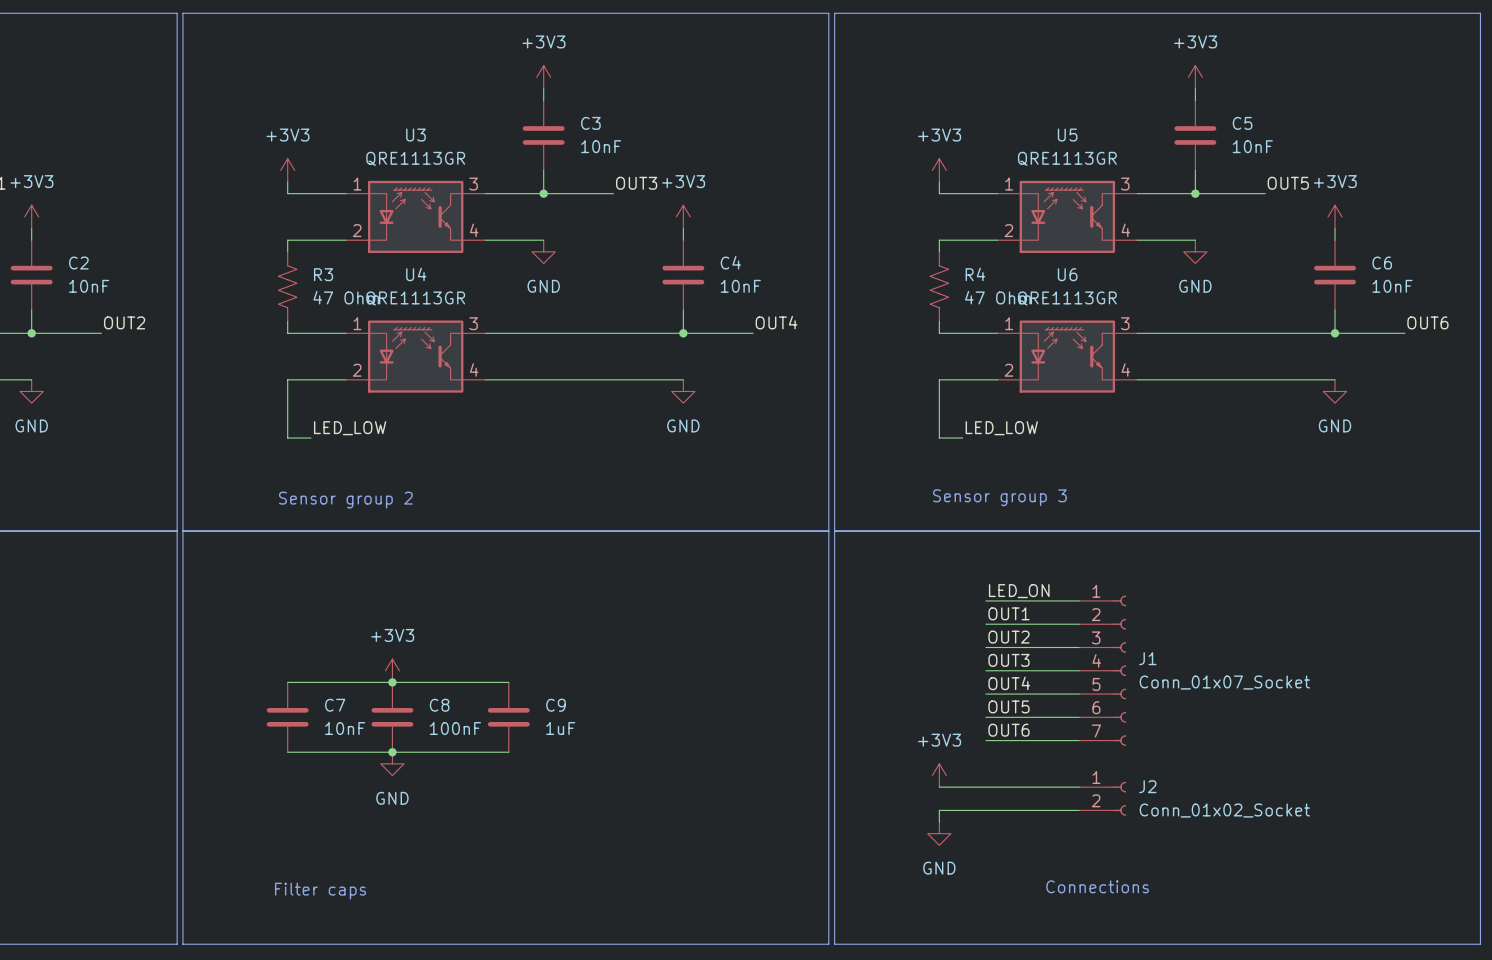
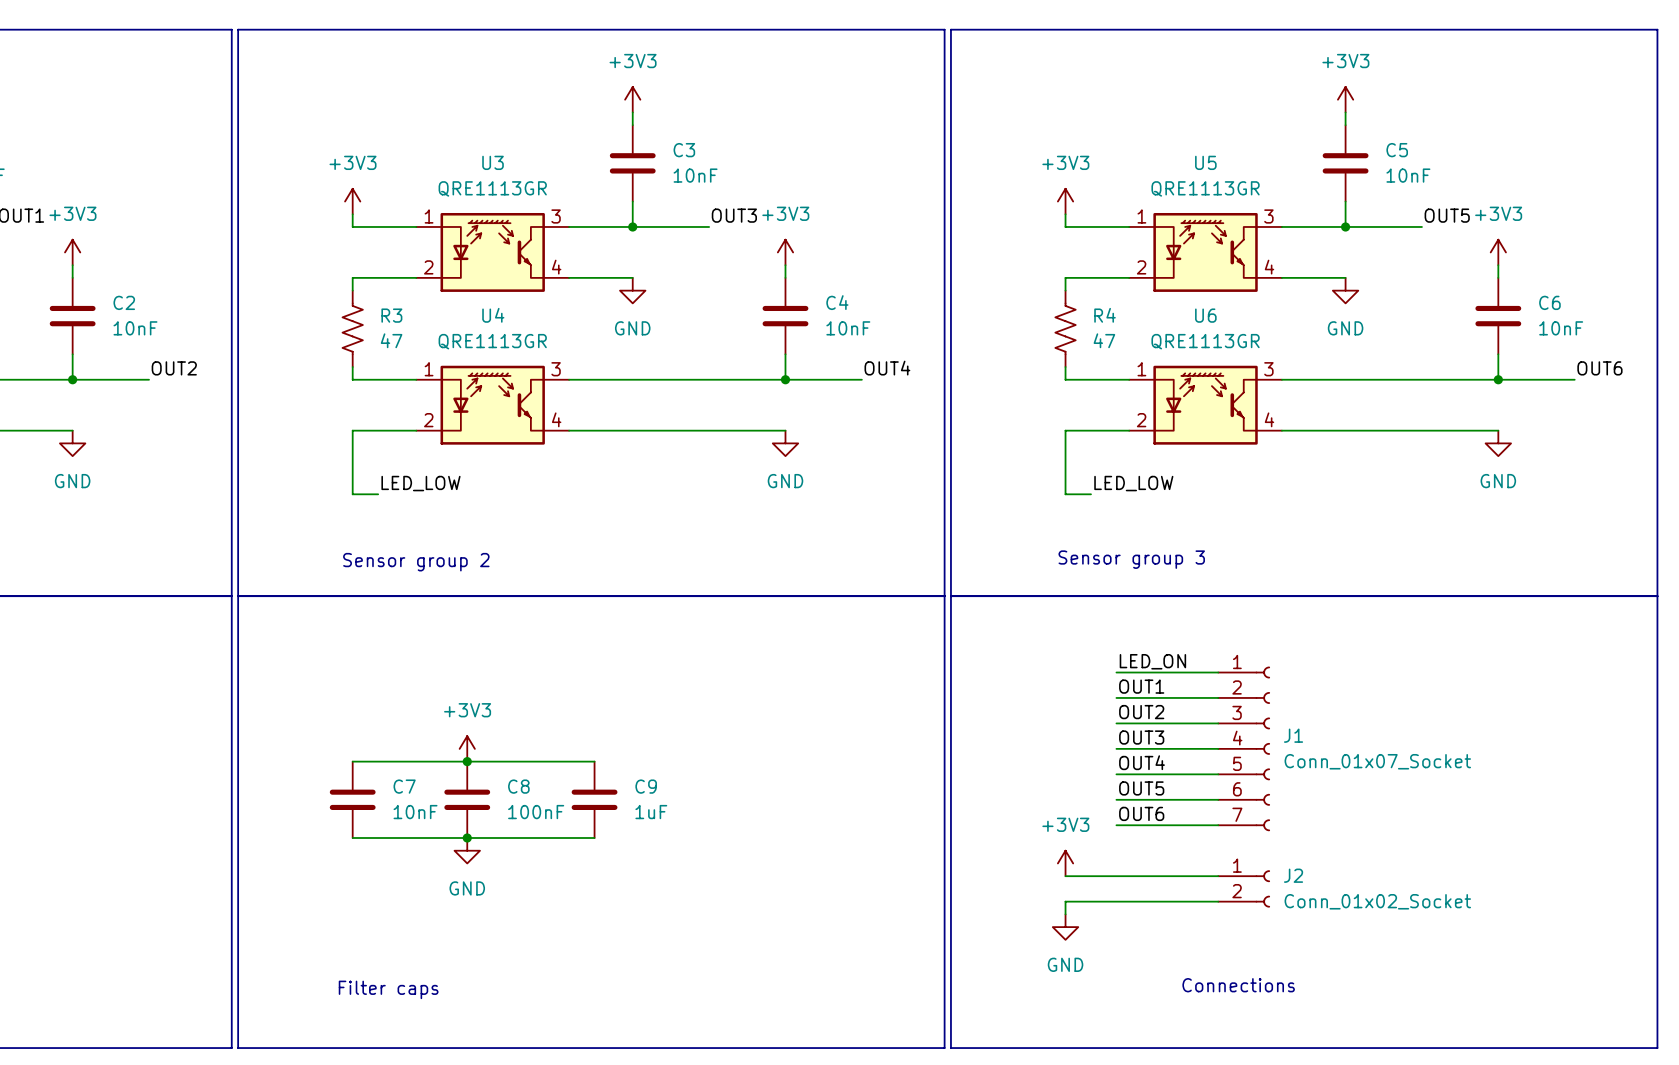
R3 value: 47 Ohm (346, 297) -> 47 (391, 340)
R4 value: 47 Ohm (997, 297) -> 47 (1104, 340)

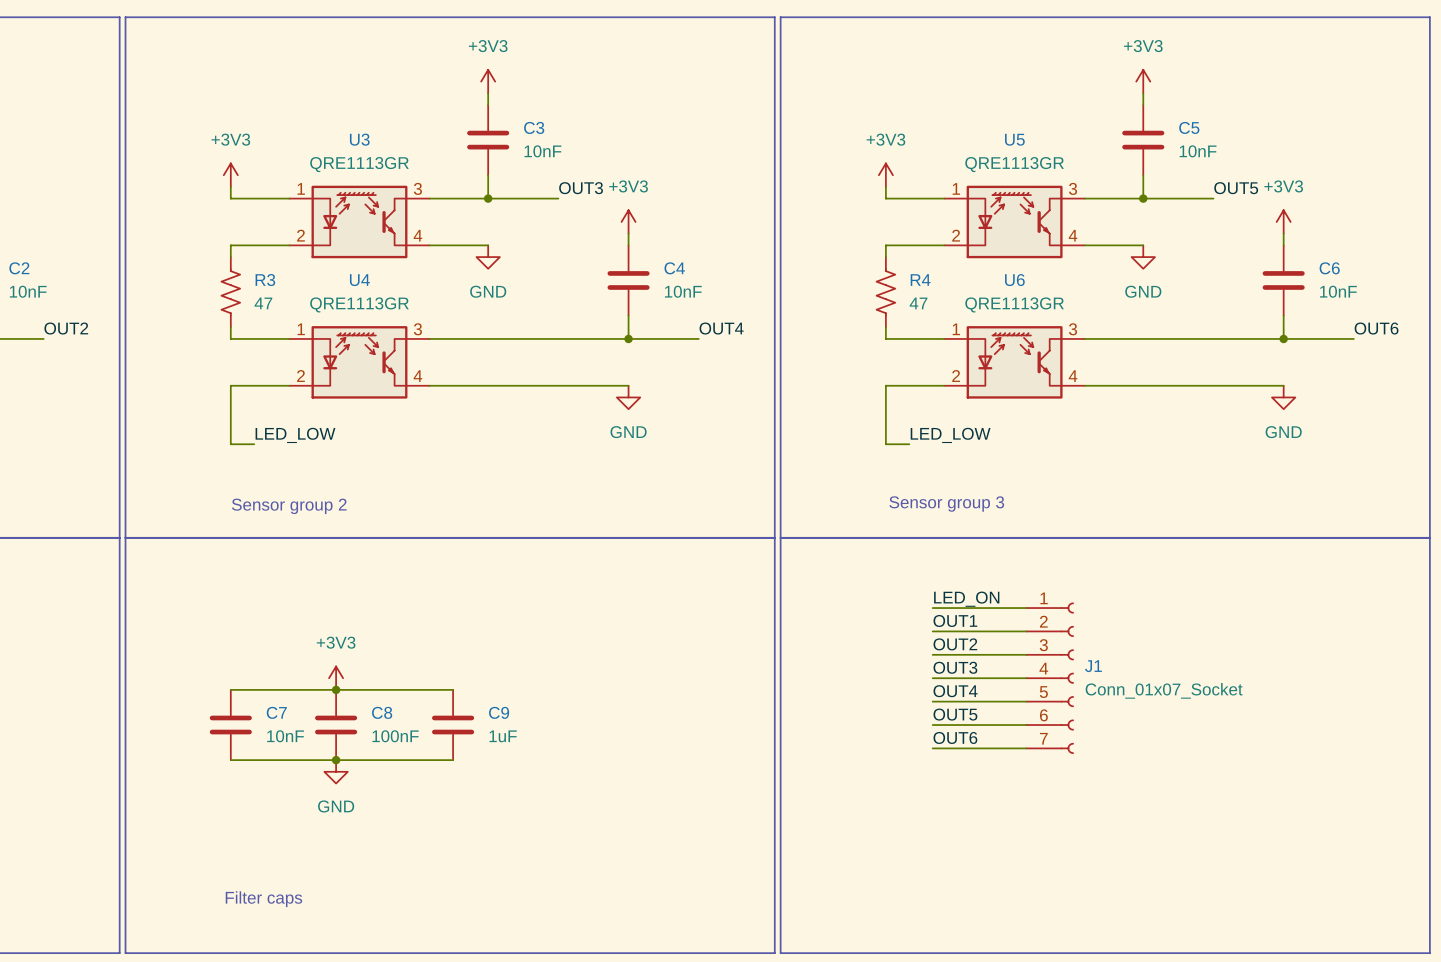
power symbol: +3V3 (1065, 863) -> none
wire: (1065, 876) (1218, 876) -> none
J2: Conn_01x02_Socket (1244, 888) -> none
wire: (1218, 901) (1065, 901) (1065, 914) -> none
power symbol: GND (1065, 927) -> none
text: Connections (1238, 985) -> none

